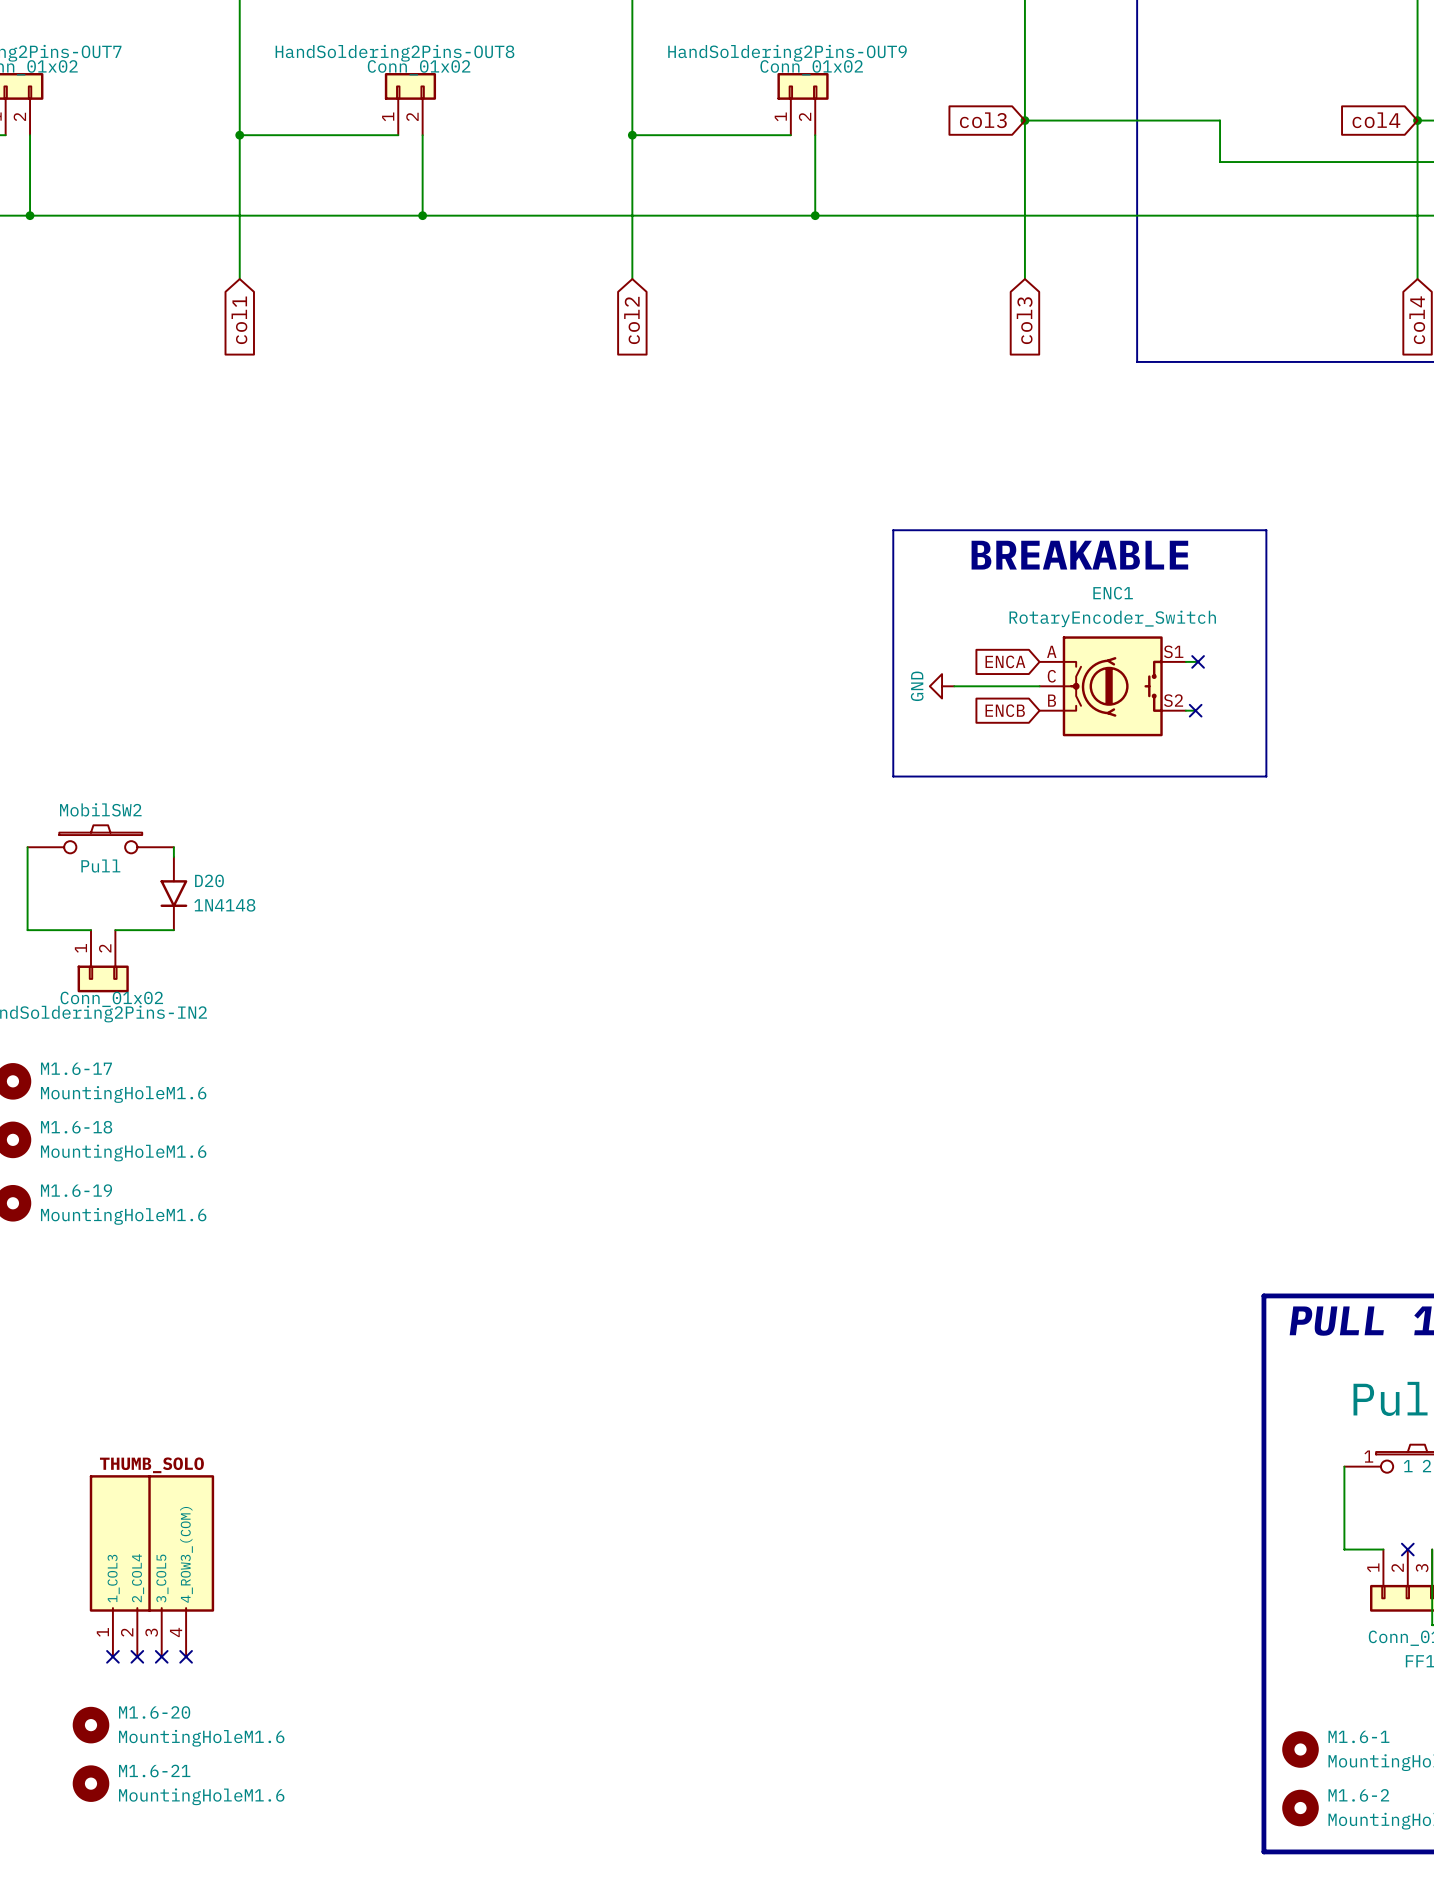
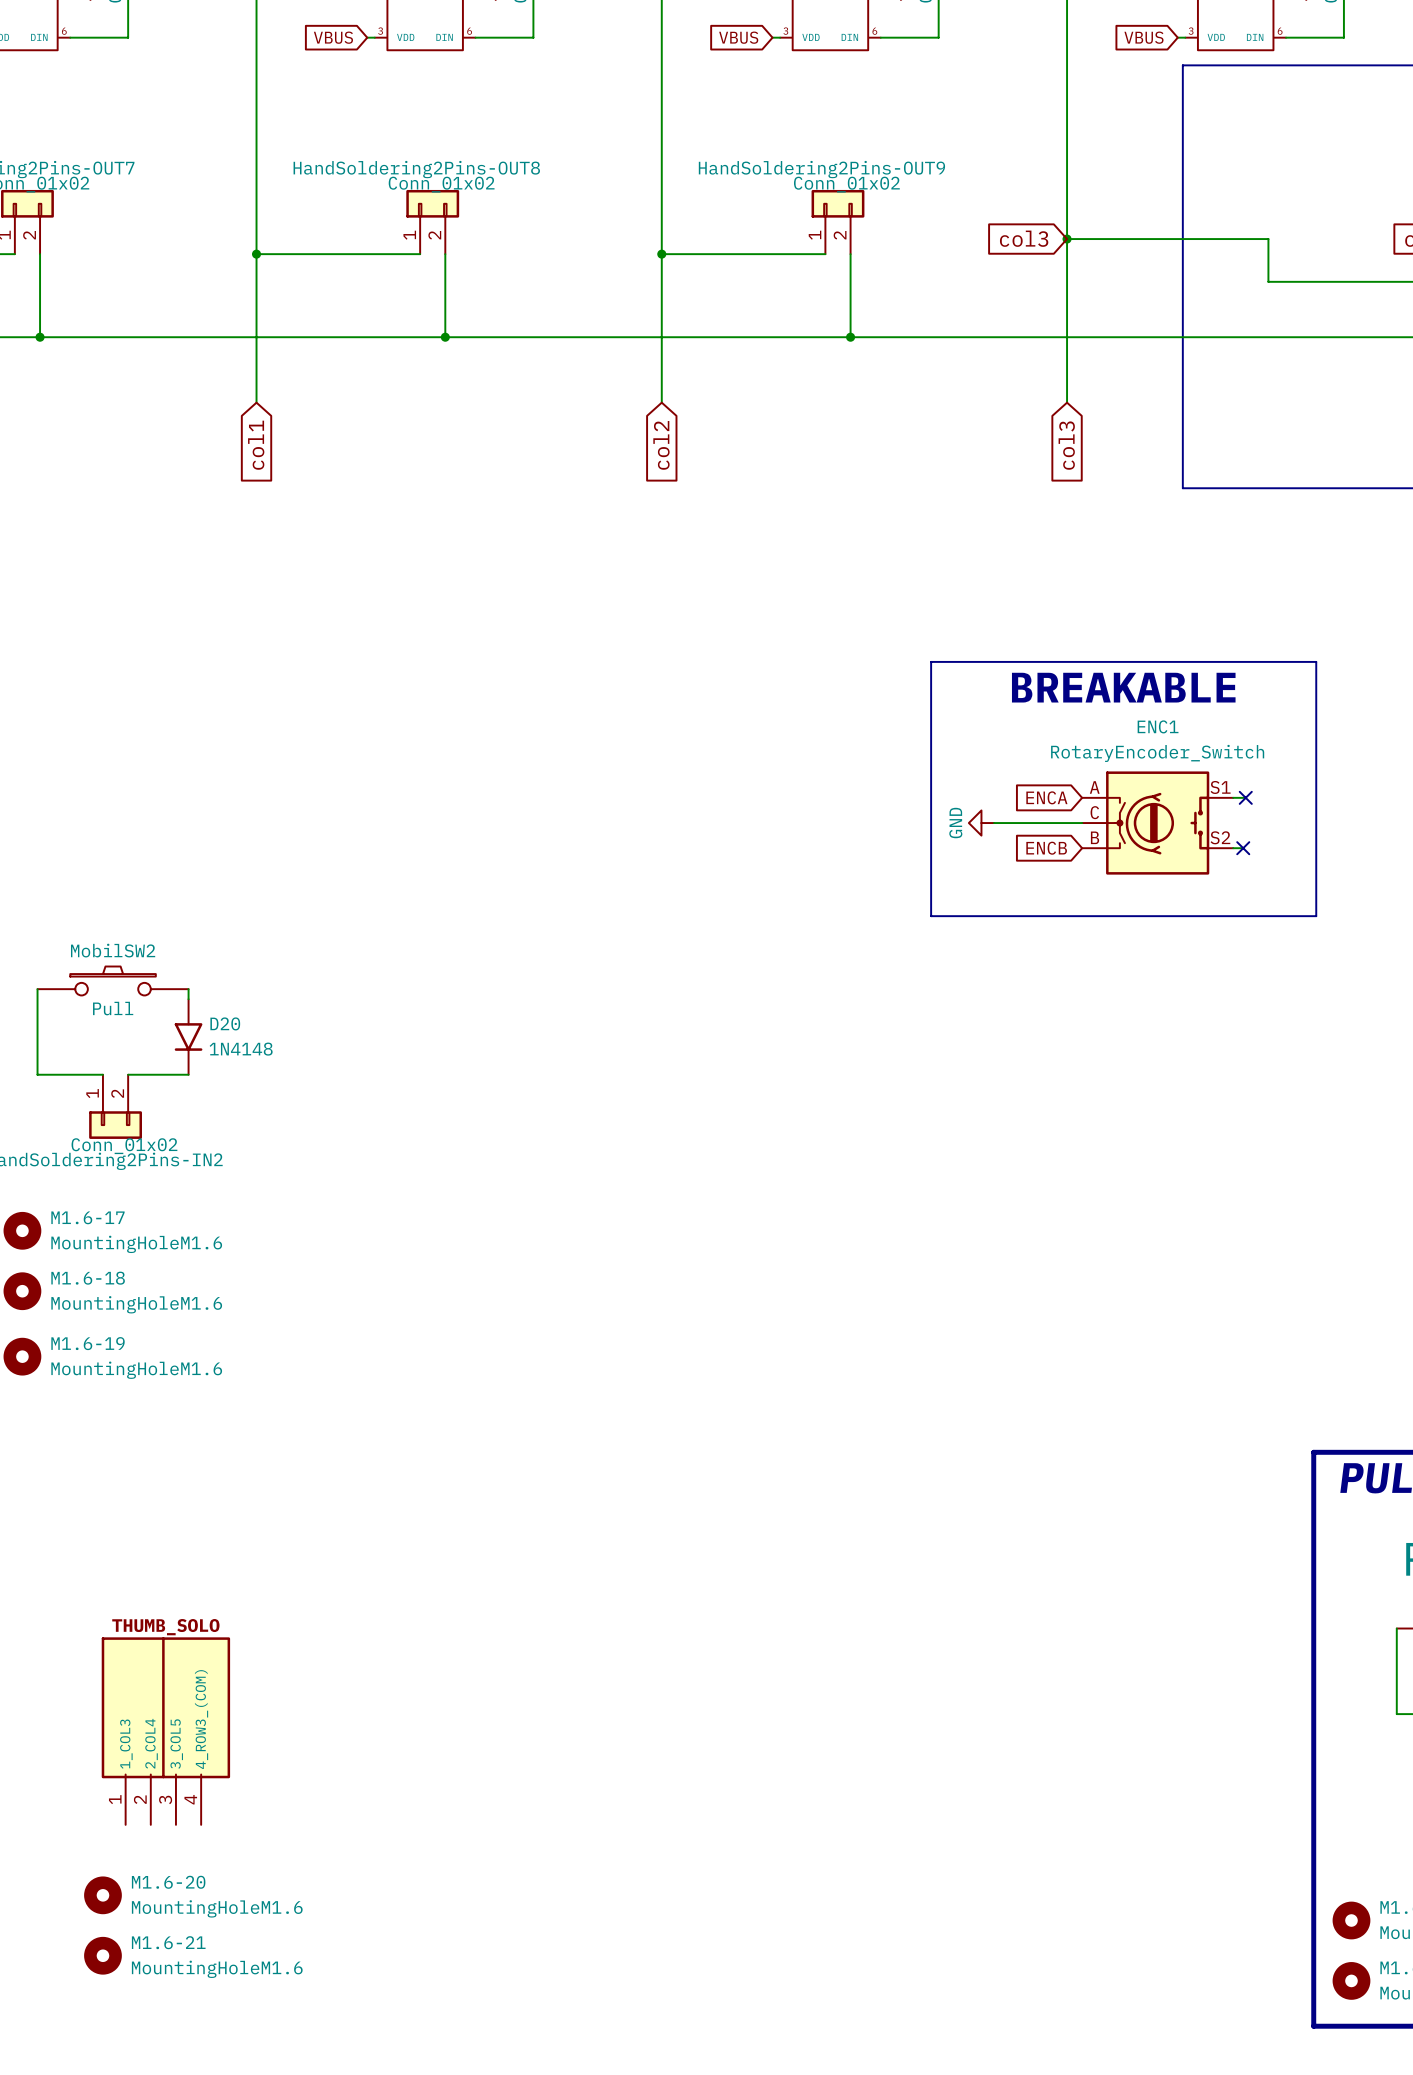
no-connect mark: (112, 1656) -> none
no-connect mark: (137, 1656) -> none
no-connect mark: (161, 1656) -> none
no-connect mark: (186, 1656) -> none

